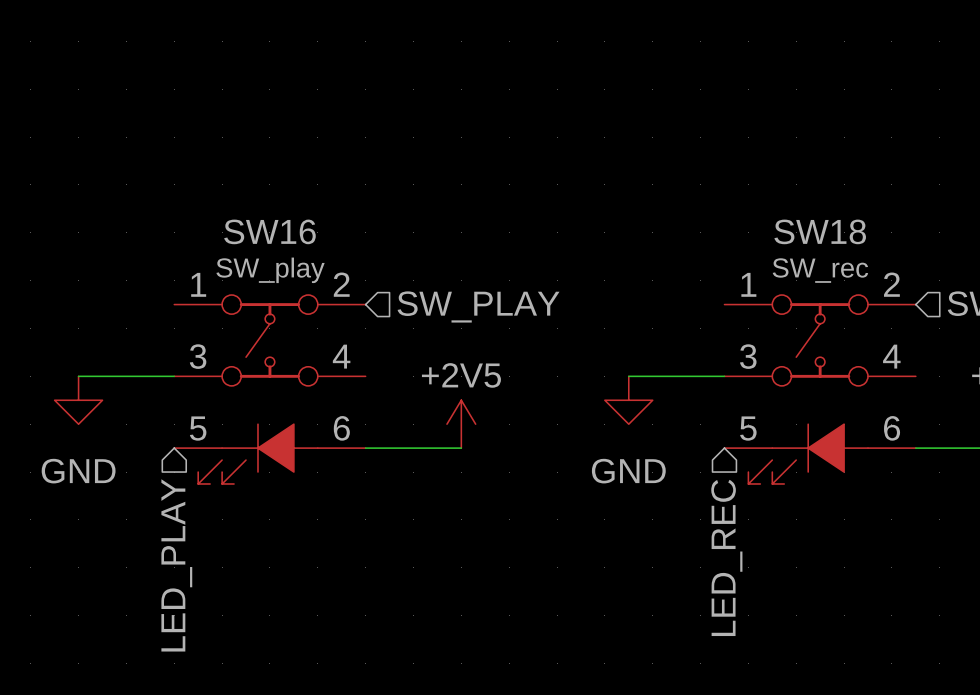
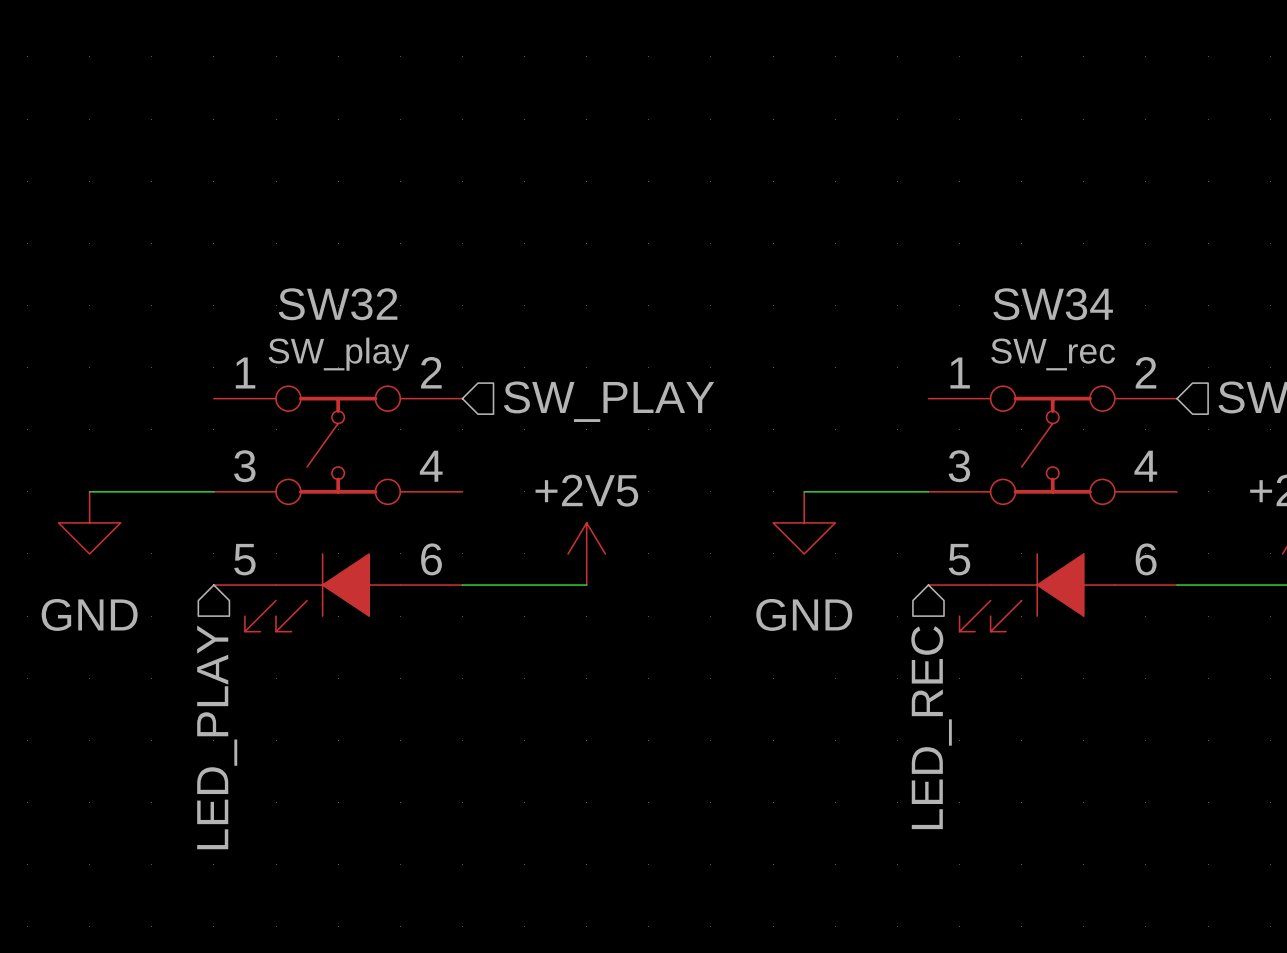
SW16 name: SW16 (269, 231) -> SW32 (338, 304)
SW18 name: SW18 (820, 231) -> SW34 (1053, 304)

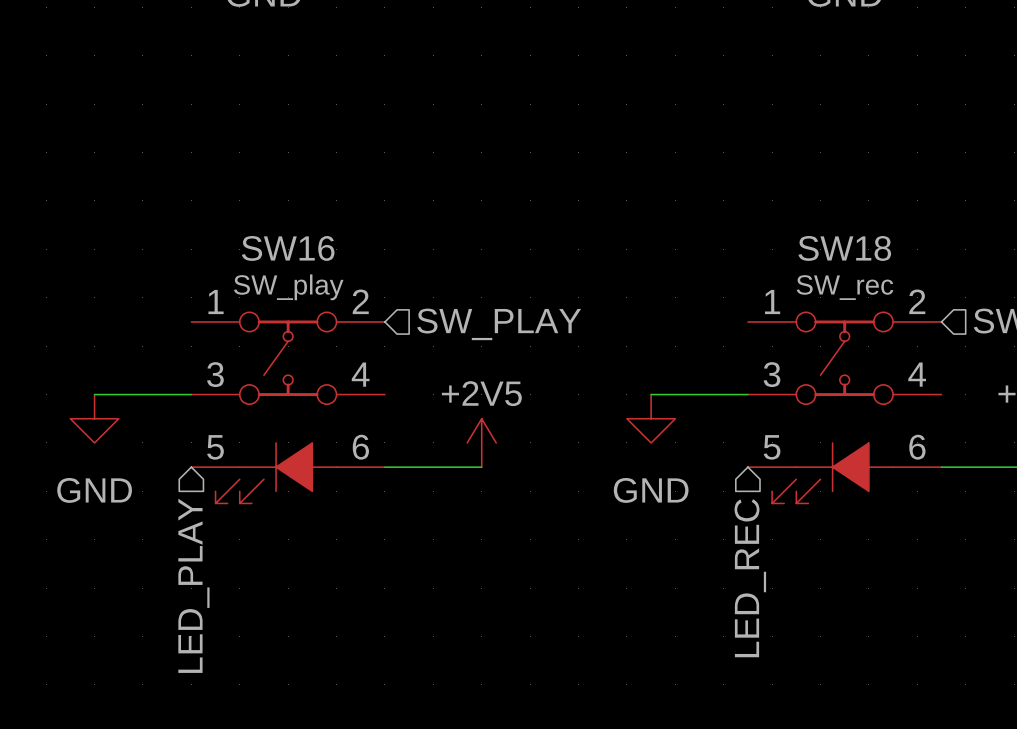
SW32 name: SW32 (338, 304) -> SW16 (288, 248)
SW34 name: SW34 (1053, 304) -> SW18 (844, 248)

